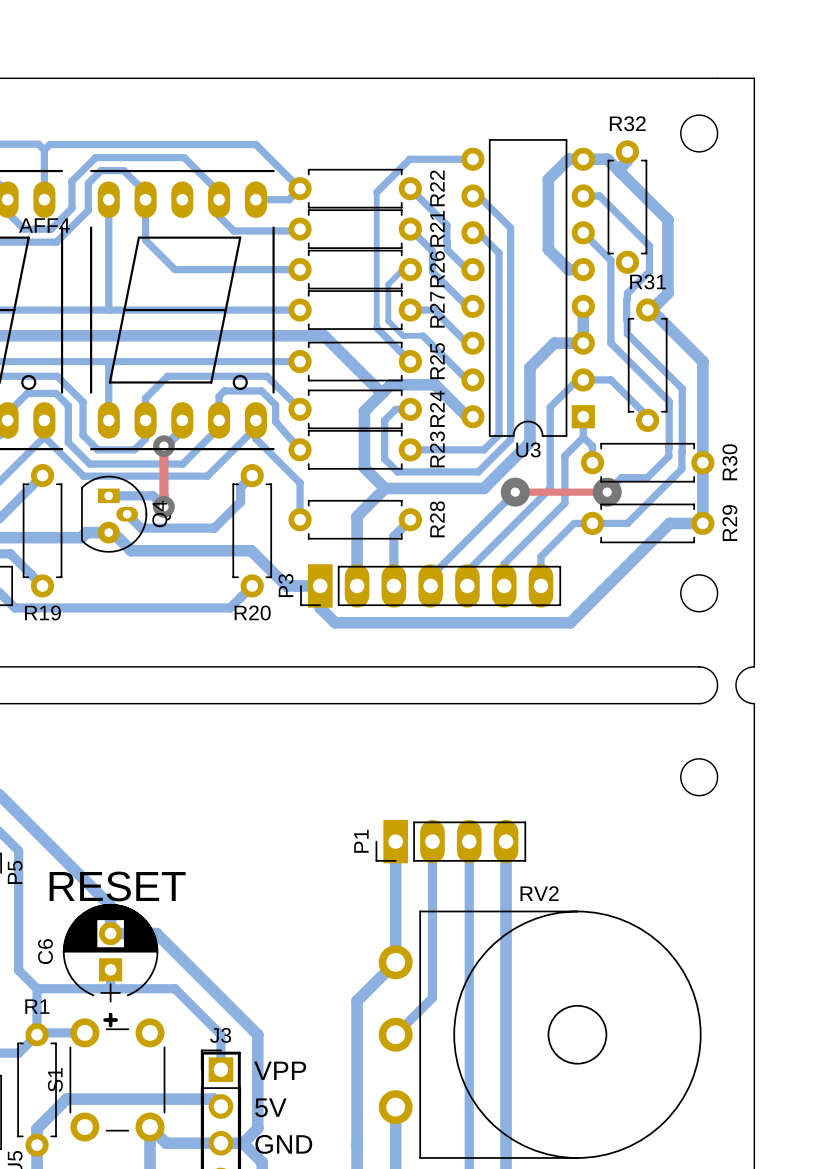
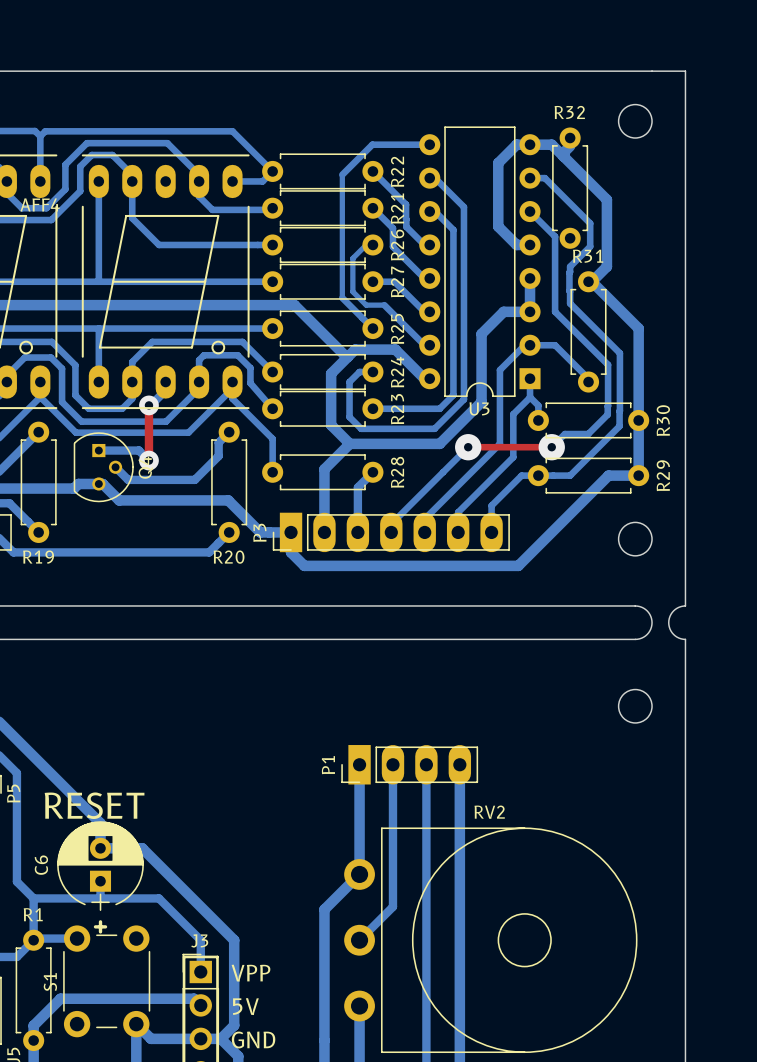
Q4 footprint: [81, 475, 148, 553] -> [73, 432, 134, 503]

